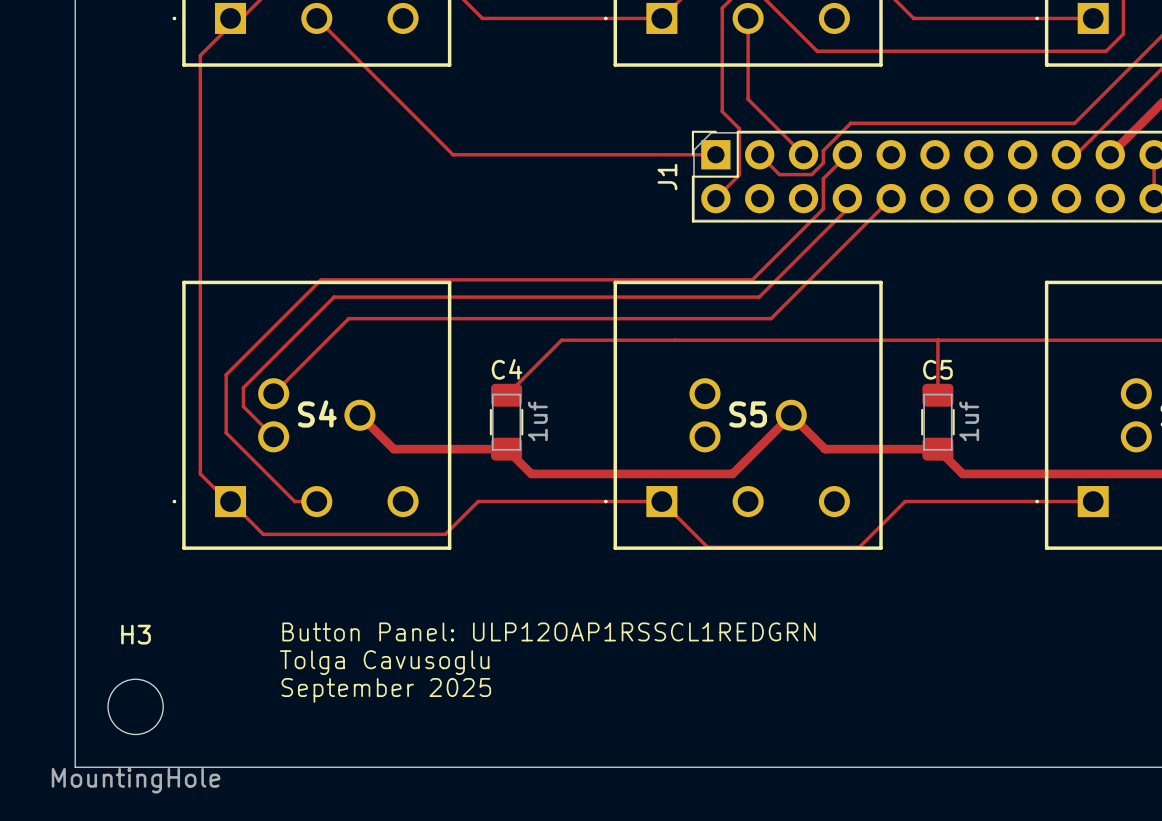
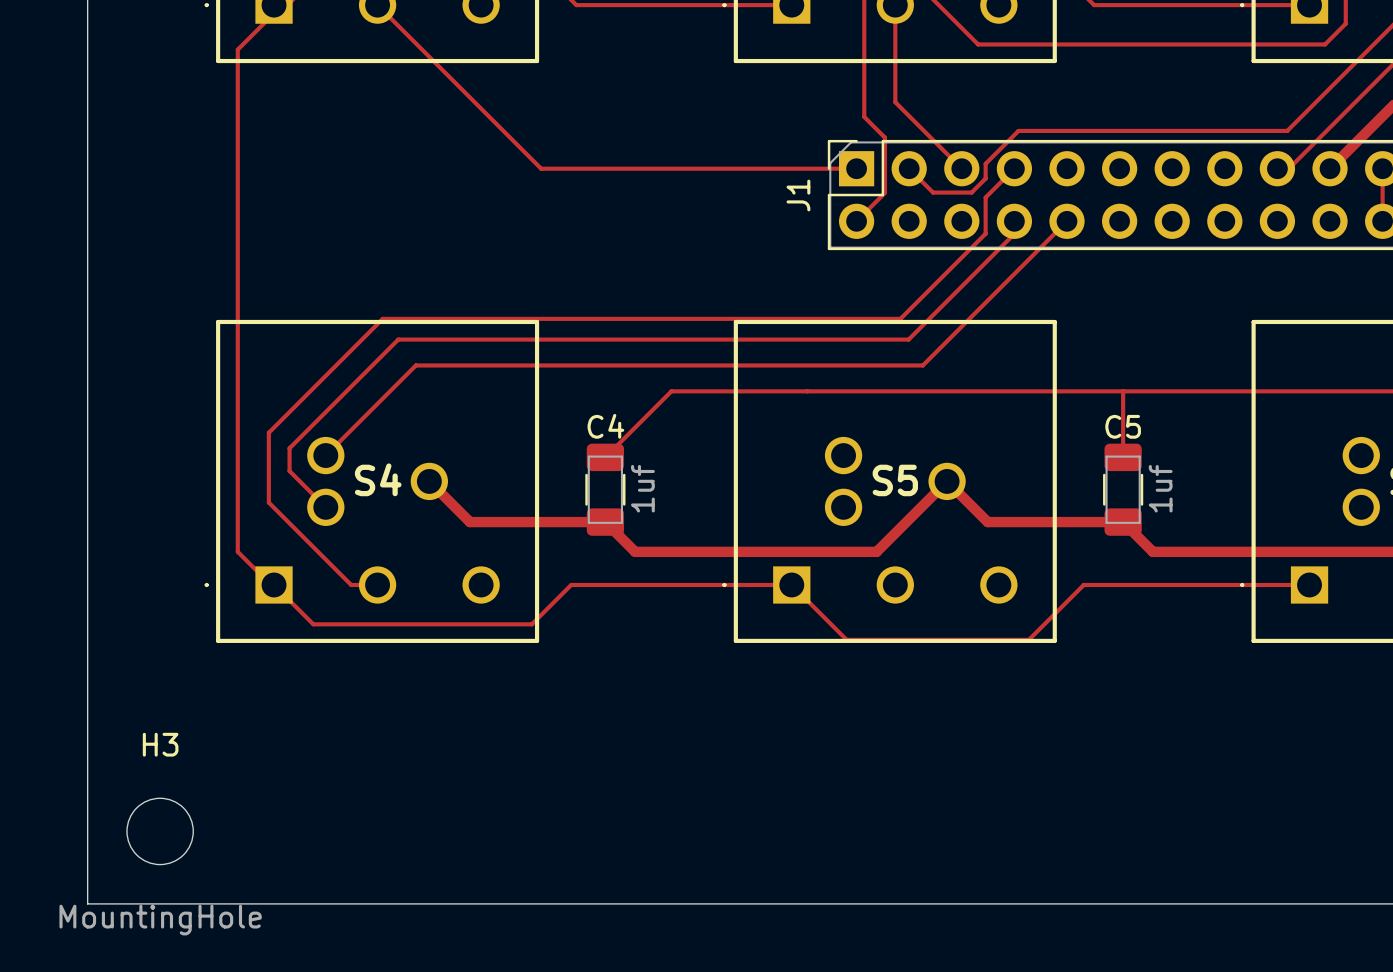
text: Button Panel: ULP12OAP1RSSCL1REDGRN (549, 631) -> none
text: Tolga Cavusoglu (384, 662) -> none
text: September 2025 (386, 690) -> none

